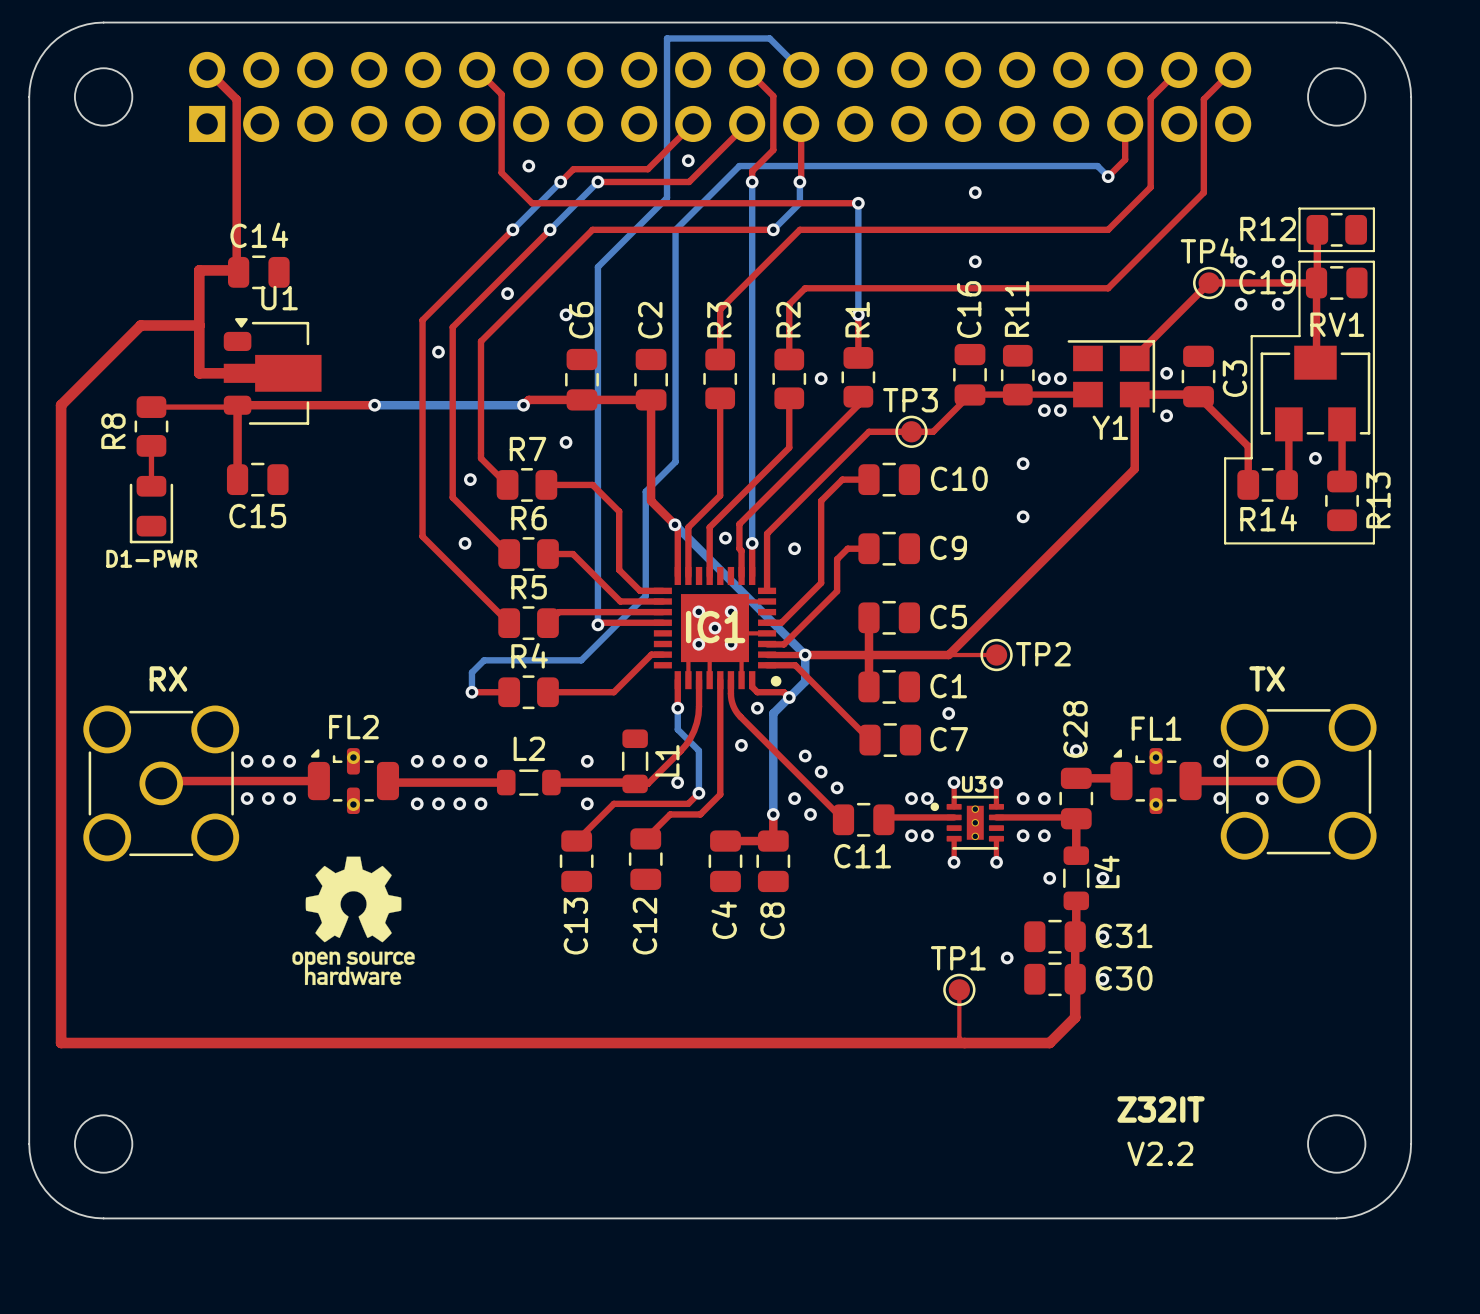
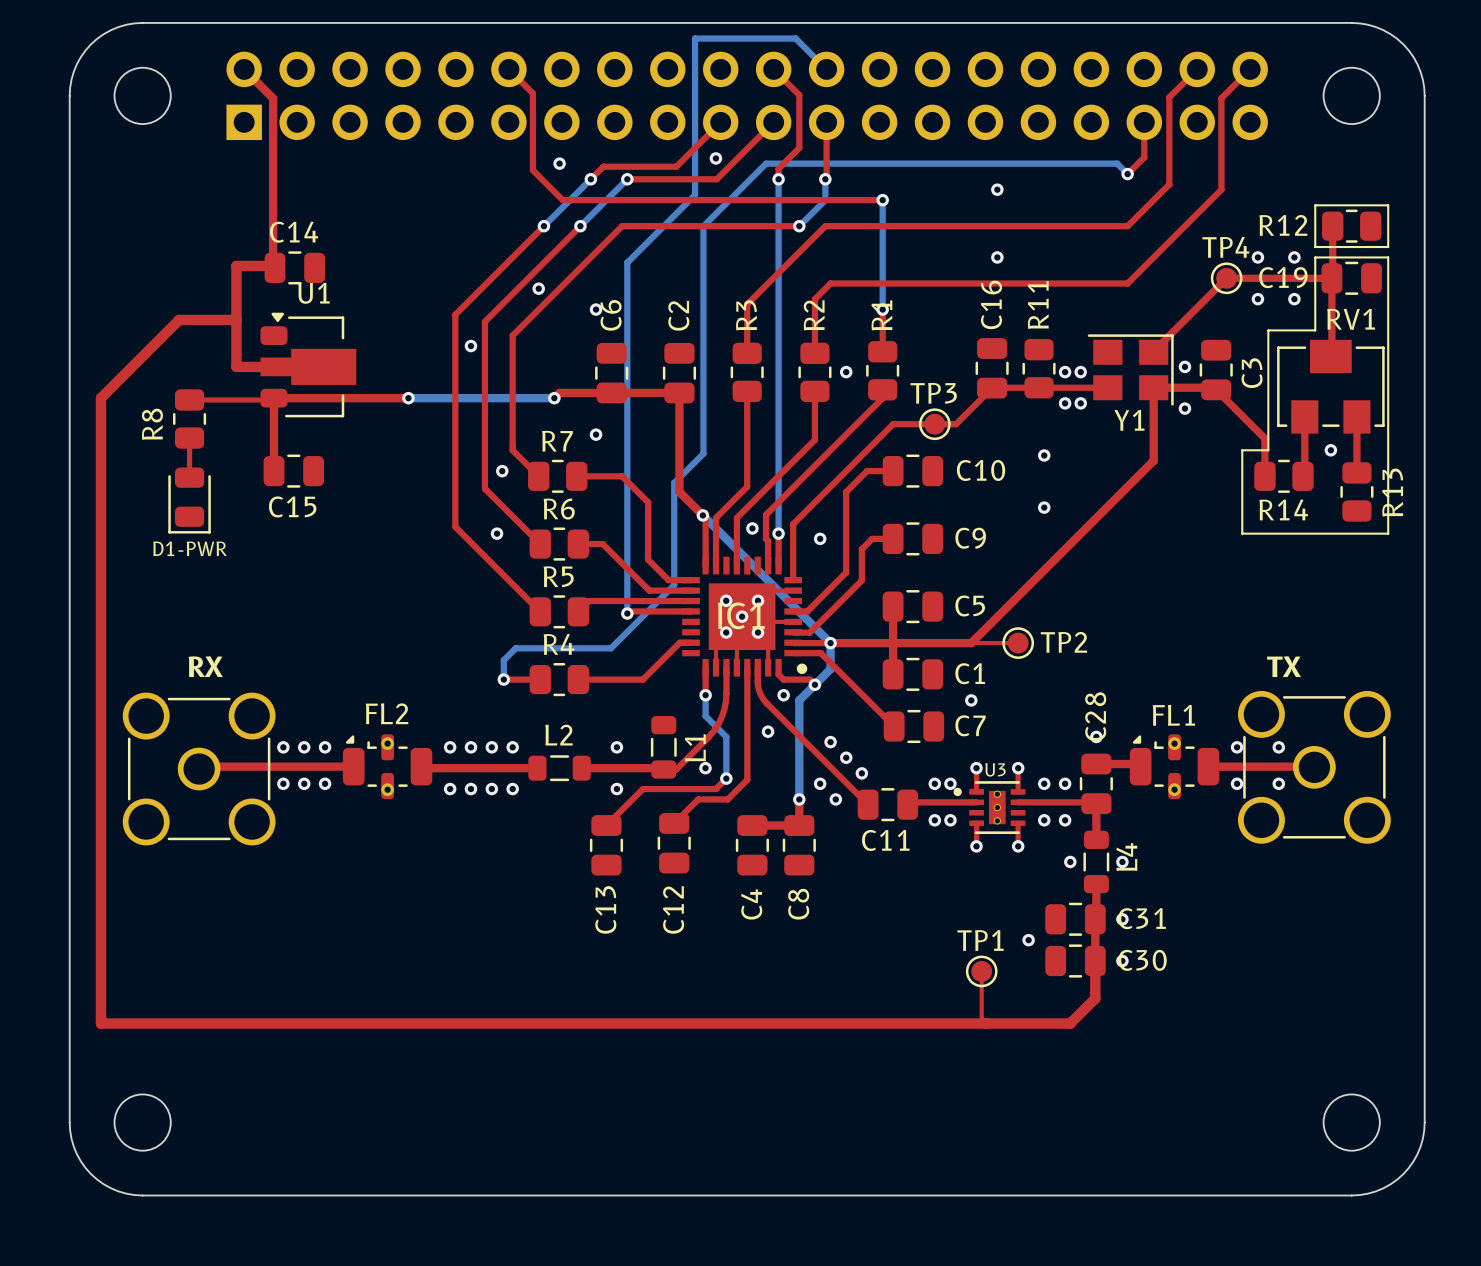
drawing: [292, 856, 415, 986] -> none
text: Z32IT (1161, 1109) -> none
text: V2.2 (1160, 1153) -> none

